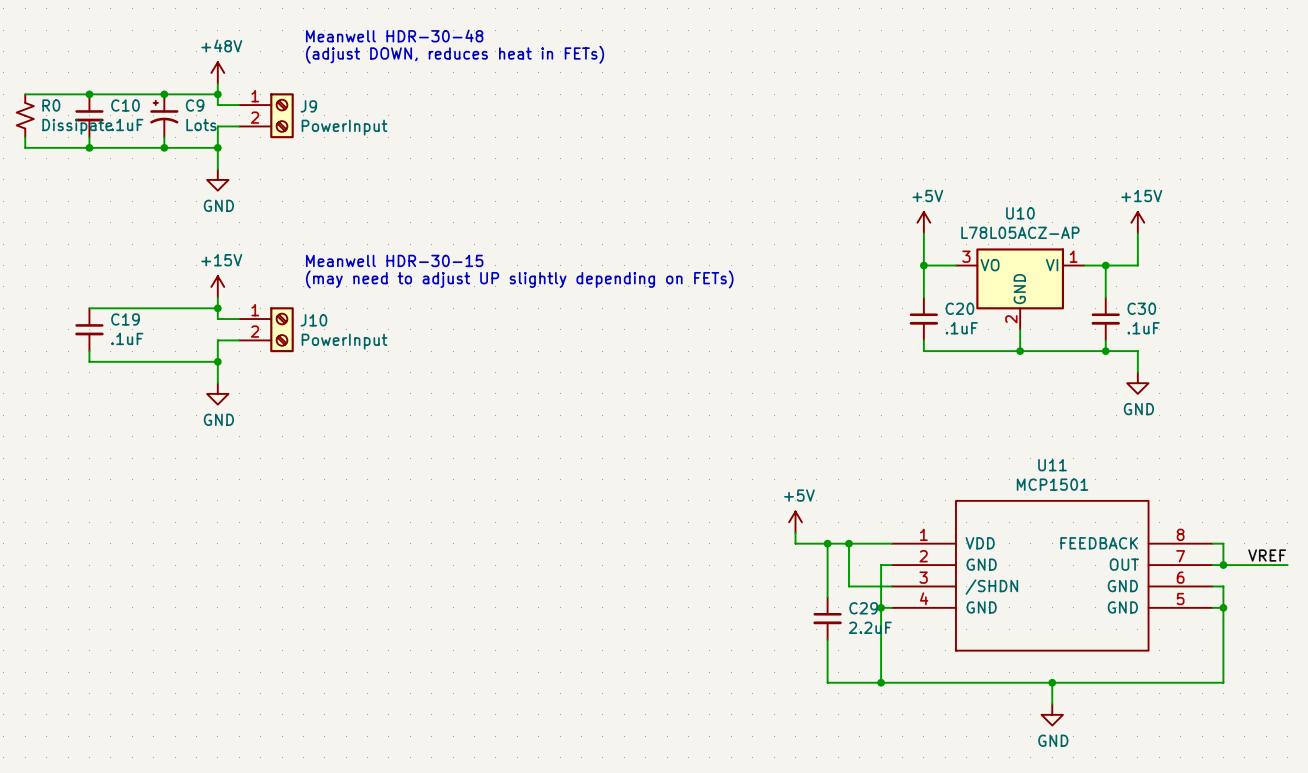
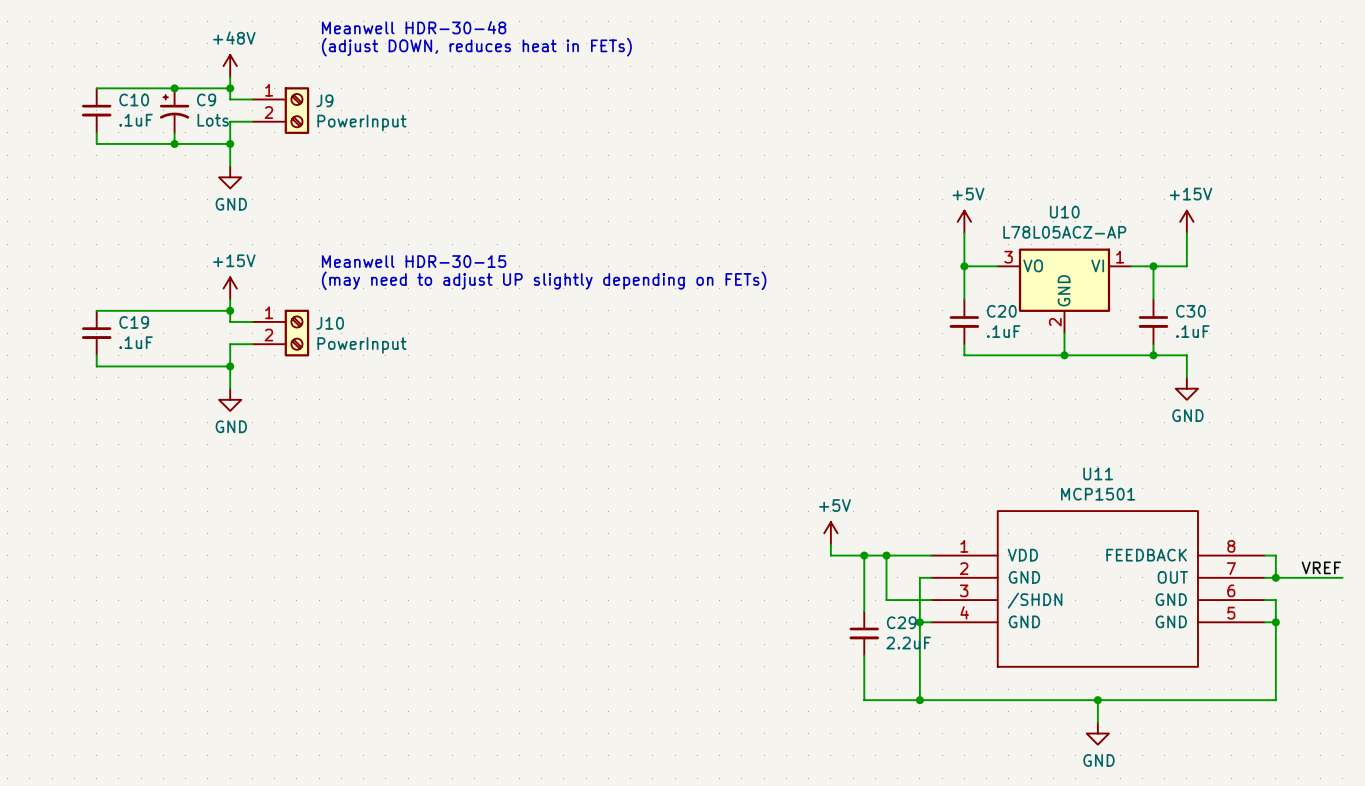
wire: (25, 94) (89, 94) -> none
junction: (89, 94) -> none
R0: Dissipate (25, 115) -> none
wire: (25, 137) (25, 147) (89, 147) -> none
junction: (89, 147) -> none

